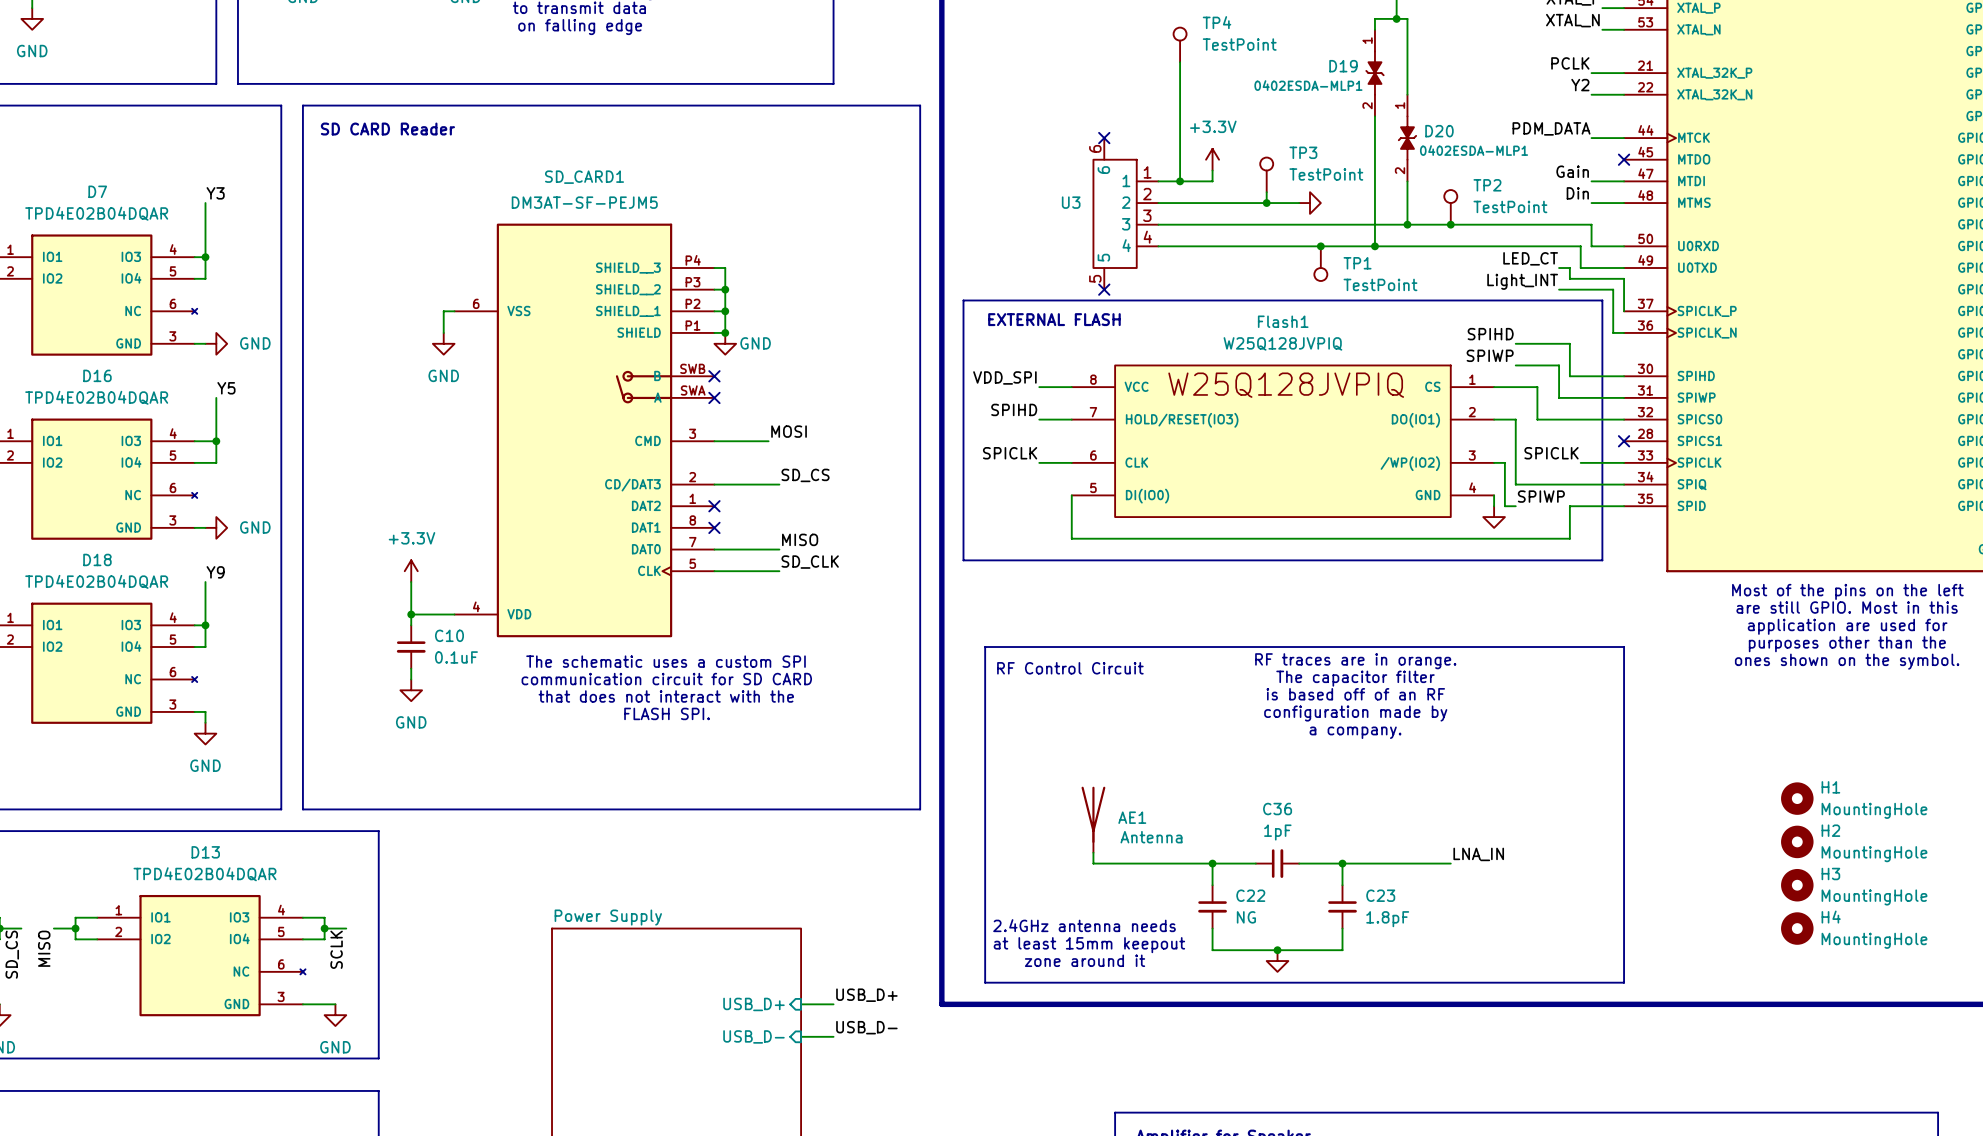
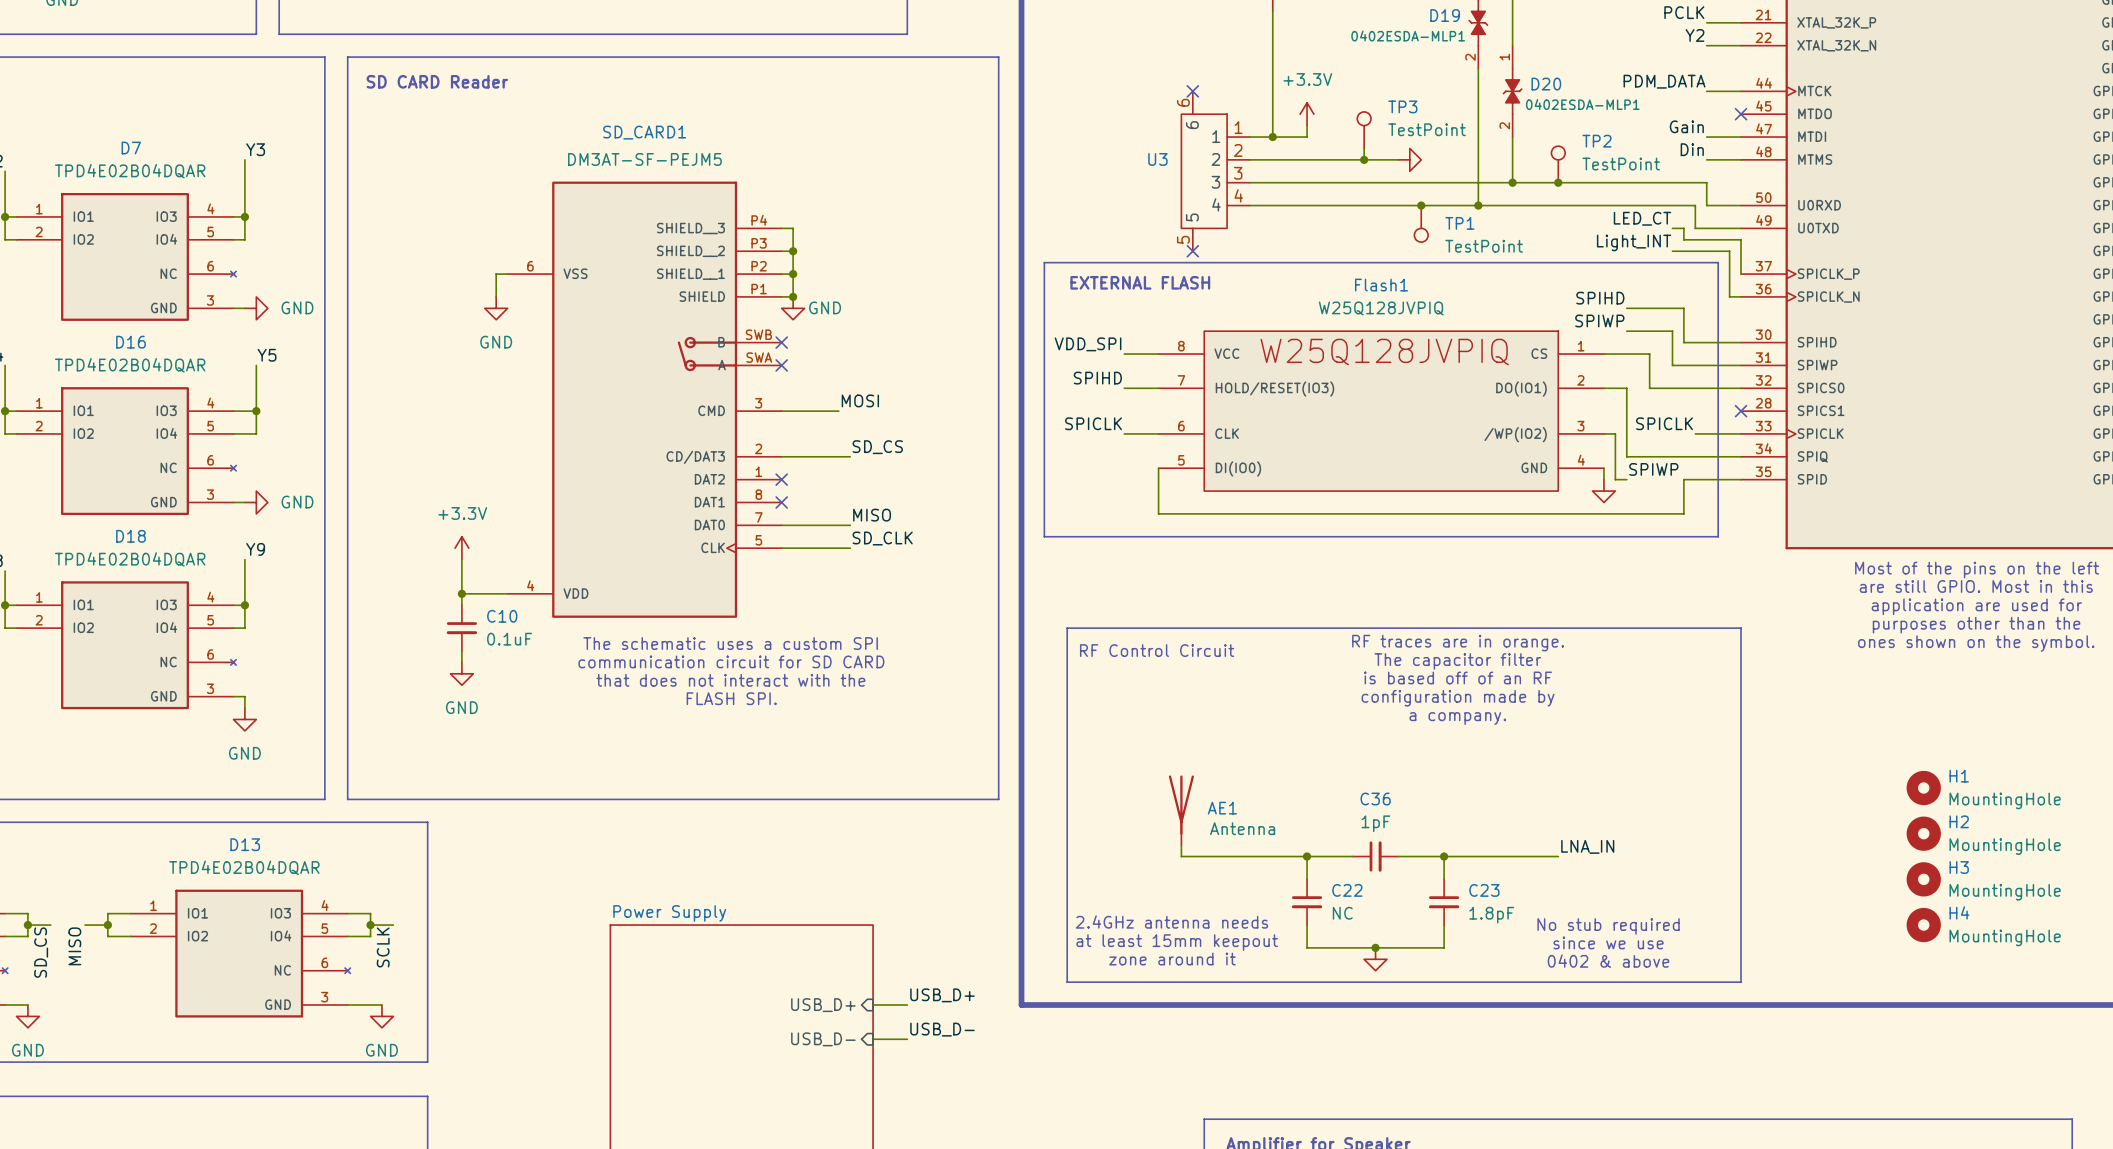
C22 value: NG (1246, 917) -> NC (1342, 913)
text: none -> No stub required (1608, 926)
text: none -> since we use (1608, 942)
text: none -> 0402 & above (1608, 961)

